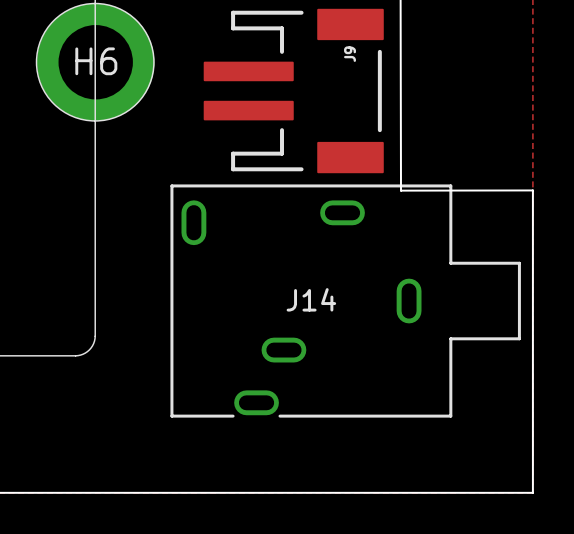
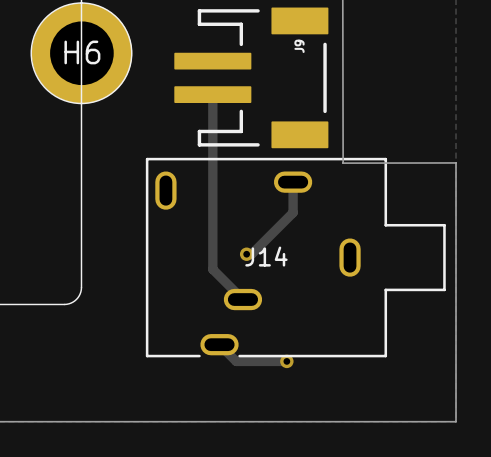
track: none -> (212, 94) (212, 269) (242, 299)
track: none -> (293, 182) (293, 212) (251, 254) (246, 254)
via: none -> (246, 254)
track: none -> (219, 344) (236, 361) (286, 361)
via: none -> (286, 361)

